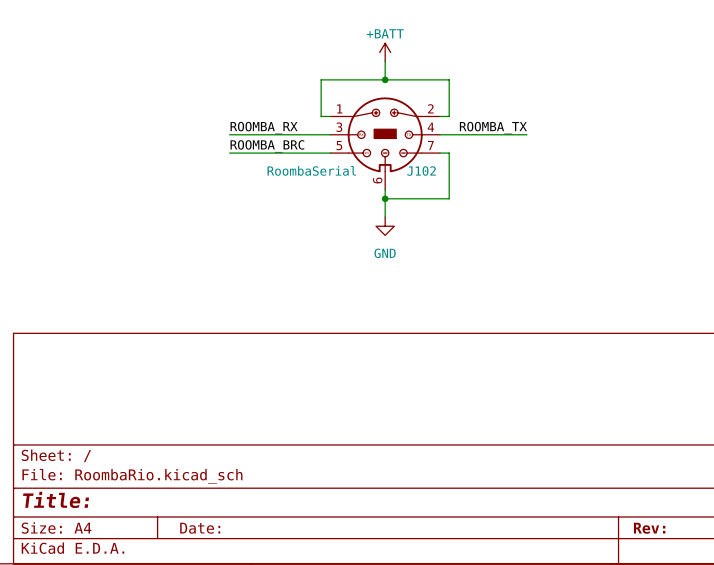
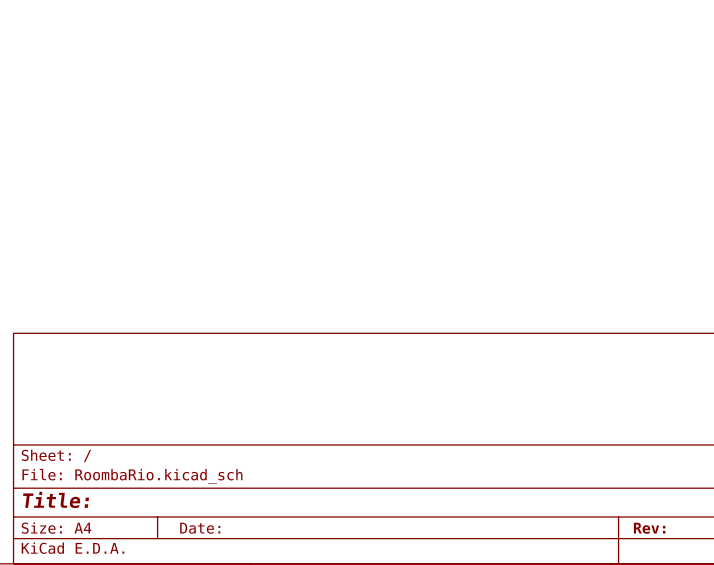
power symbol: +BATT (385, 52) -> none
wire: (385, 61) (385, 79) -> none
junction: (385, 79) -> none
wire: (330, 116) (321, 116) (321, 79) (449, 79) (449, 116) (440, 116) -> none
label: ROOMBA_RX (264, 128) -> none
label: ROOMBA_TX (493, 128) -> none
wire: (229, 134) (330, 134) -> none
wire: (440, 134) (526, 134) -> none
J102: RoombaSerial (385, 143) -> none
label: ROOMBA_BRC (267, 146) -> none
wire: (229, 153) (330, 153) -> none
wire: (440, 153) (449, 153) (449, 198) (385, 198) -> none
wire: (385, 189) (385, 217) -> none
junction: (385, 198) -> none
power symbol: GND (385, 226) -> none

